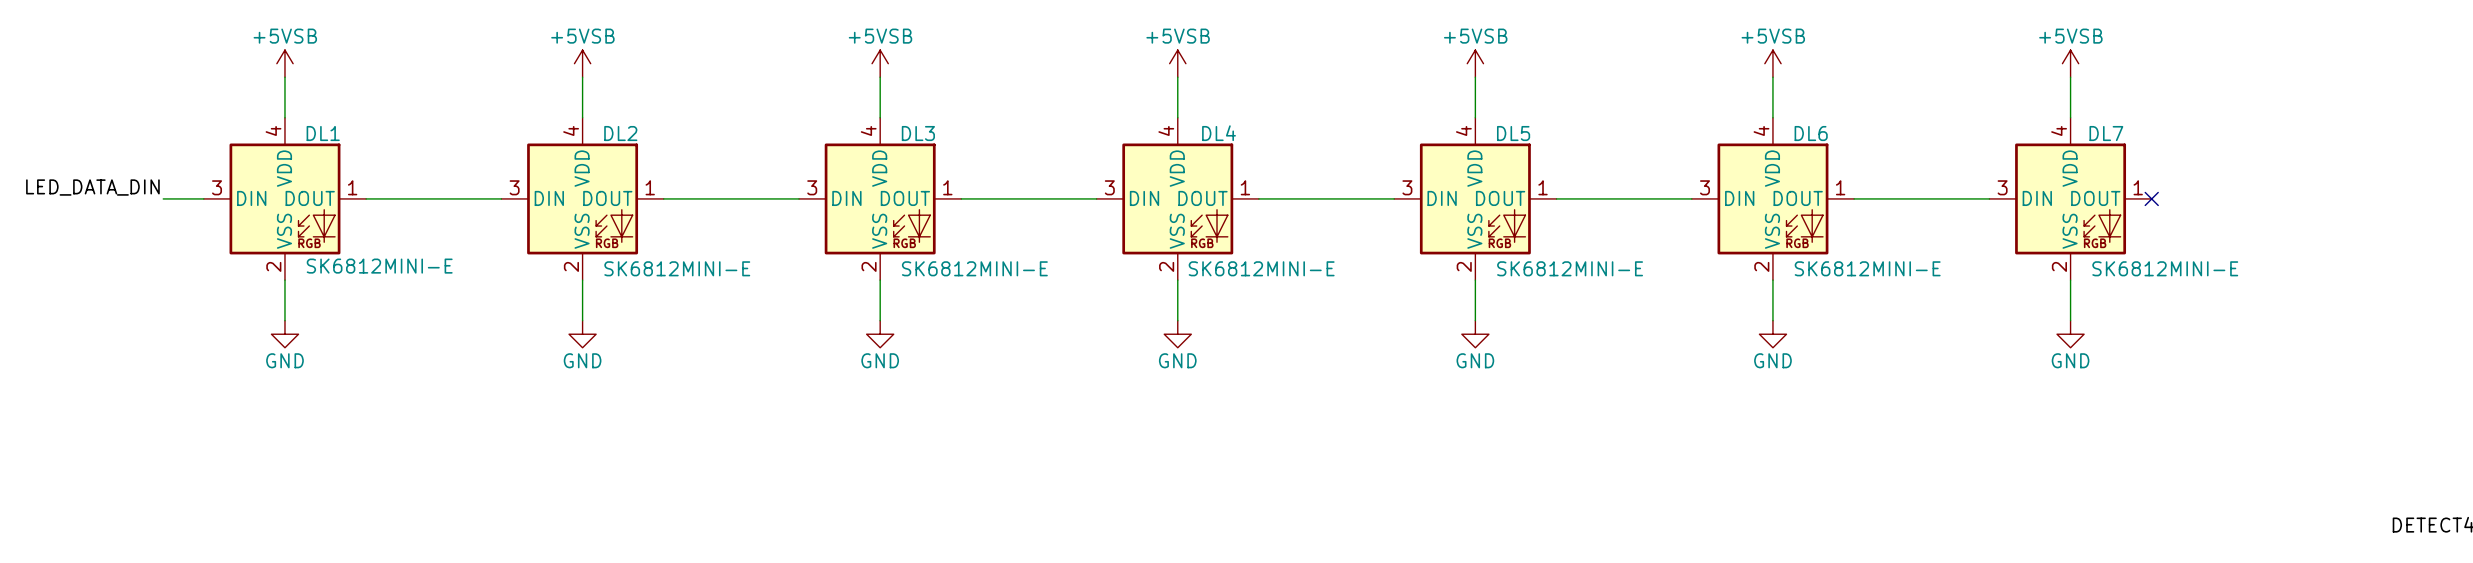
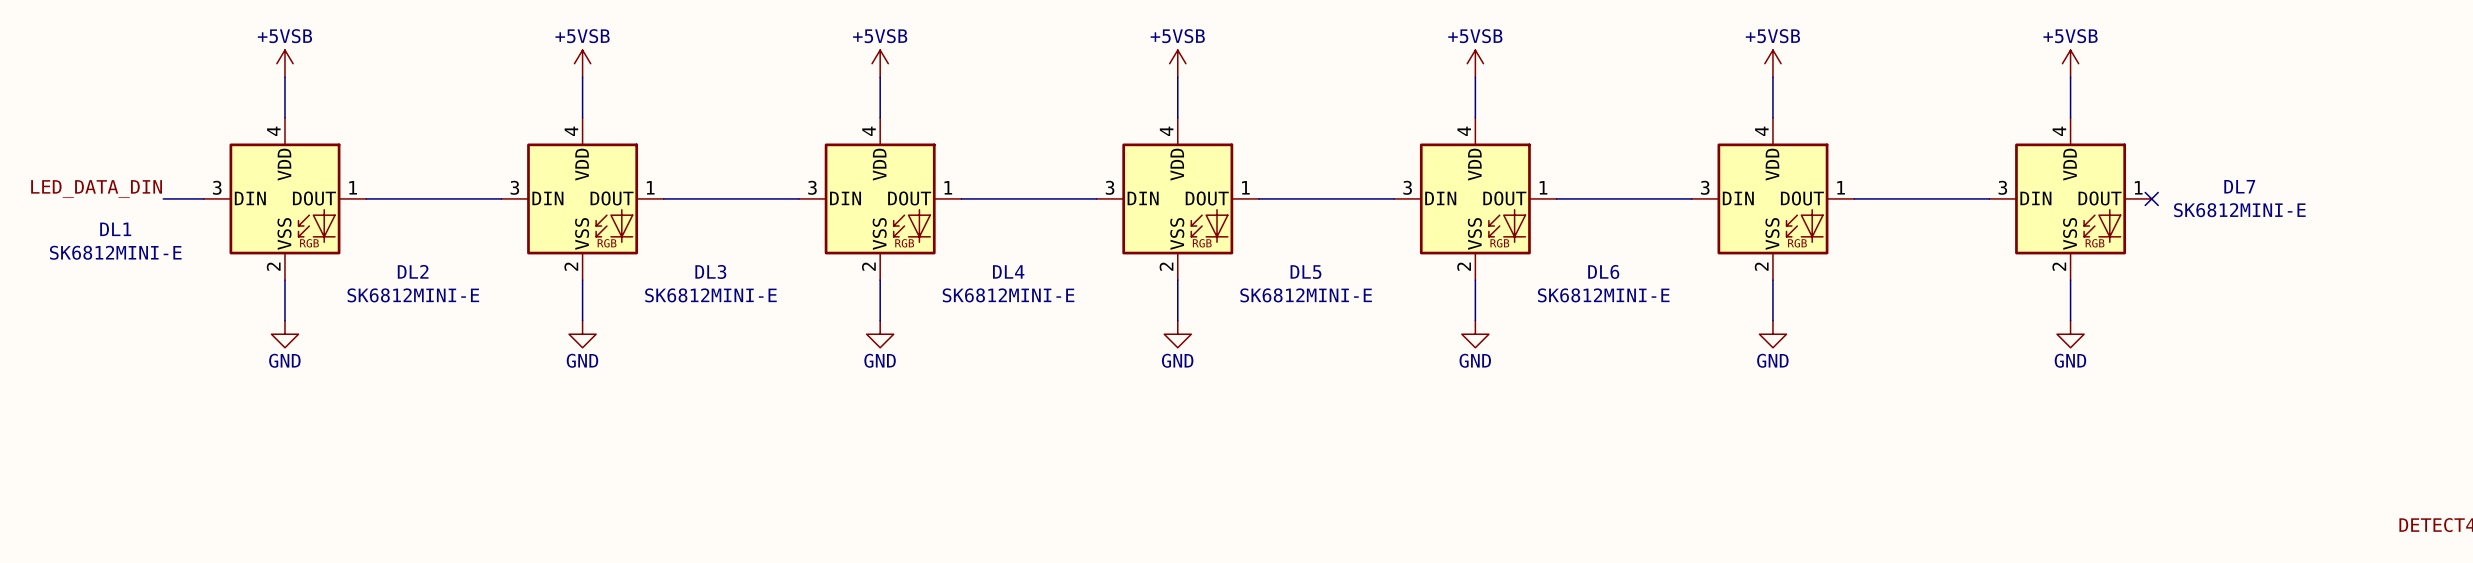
DL1 name position: DL1 (323, 133) -> DL1 (115, 229)
DL2 name position: DL2 (620, 133) -> DL2 (413, 271)
DL3 name position: DL3 (918, 133) -> DL3 (710, 271)
DL4 name position: DL4 (1219, 133) -> DL4 (1008, 271)
DL5 name position: DL5 (1513, 133) -> DL5 (1305, 272)
DL6 name position: DL6 (1811, 133) -> DL6 (1603, 271)
DL7 name position: DL7 (2106, 133) -> DL7 (2239, 186)
DL1 value position: SK6812MINI-E (379, 266) -> SK6812MINI-E (115, 252)
DL2 value position: SK6812MINI-E (677, 268) -> SK6812MINI-E (413, 295)
DL3 value position: SK6812MINI-E (974, 268) -> SK6812MINI-E (710, 295)
DL4 value position: SK6812MINI-E (1261, 268) -> SK6812MINI-E (1008, 295)
DL5 value position: SK6812MINI-E (1570, 268) -> SK6812MINI-E (1306, 295)
DL6 value position: SK6812MINI-E (1867, 268) -> SK6812MINI-E (1603, 295)
DL7 value position: SK6812MINI-E (2165, 268) -> SK6812MINI-E (2239, 210)

